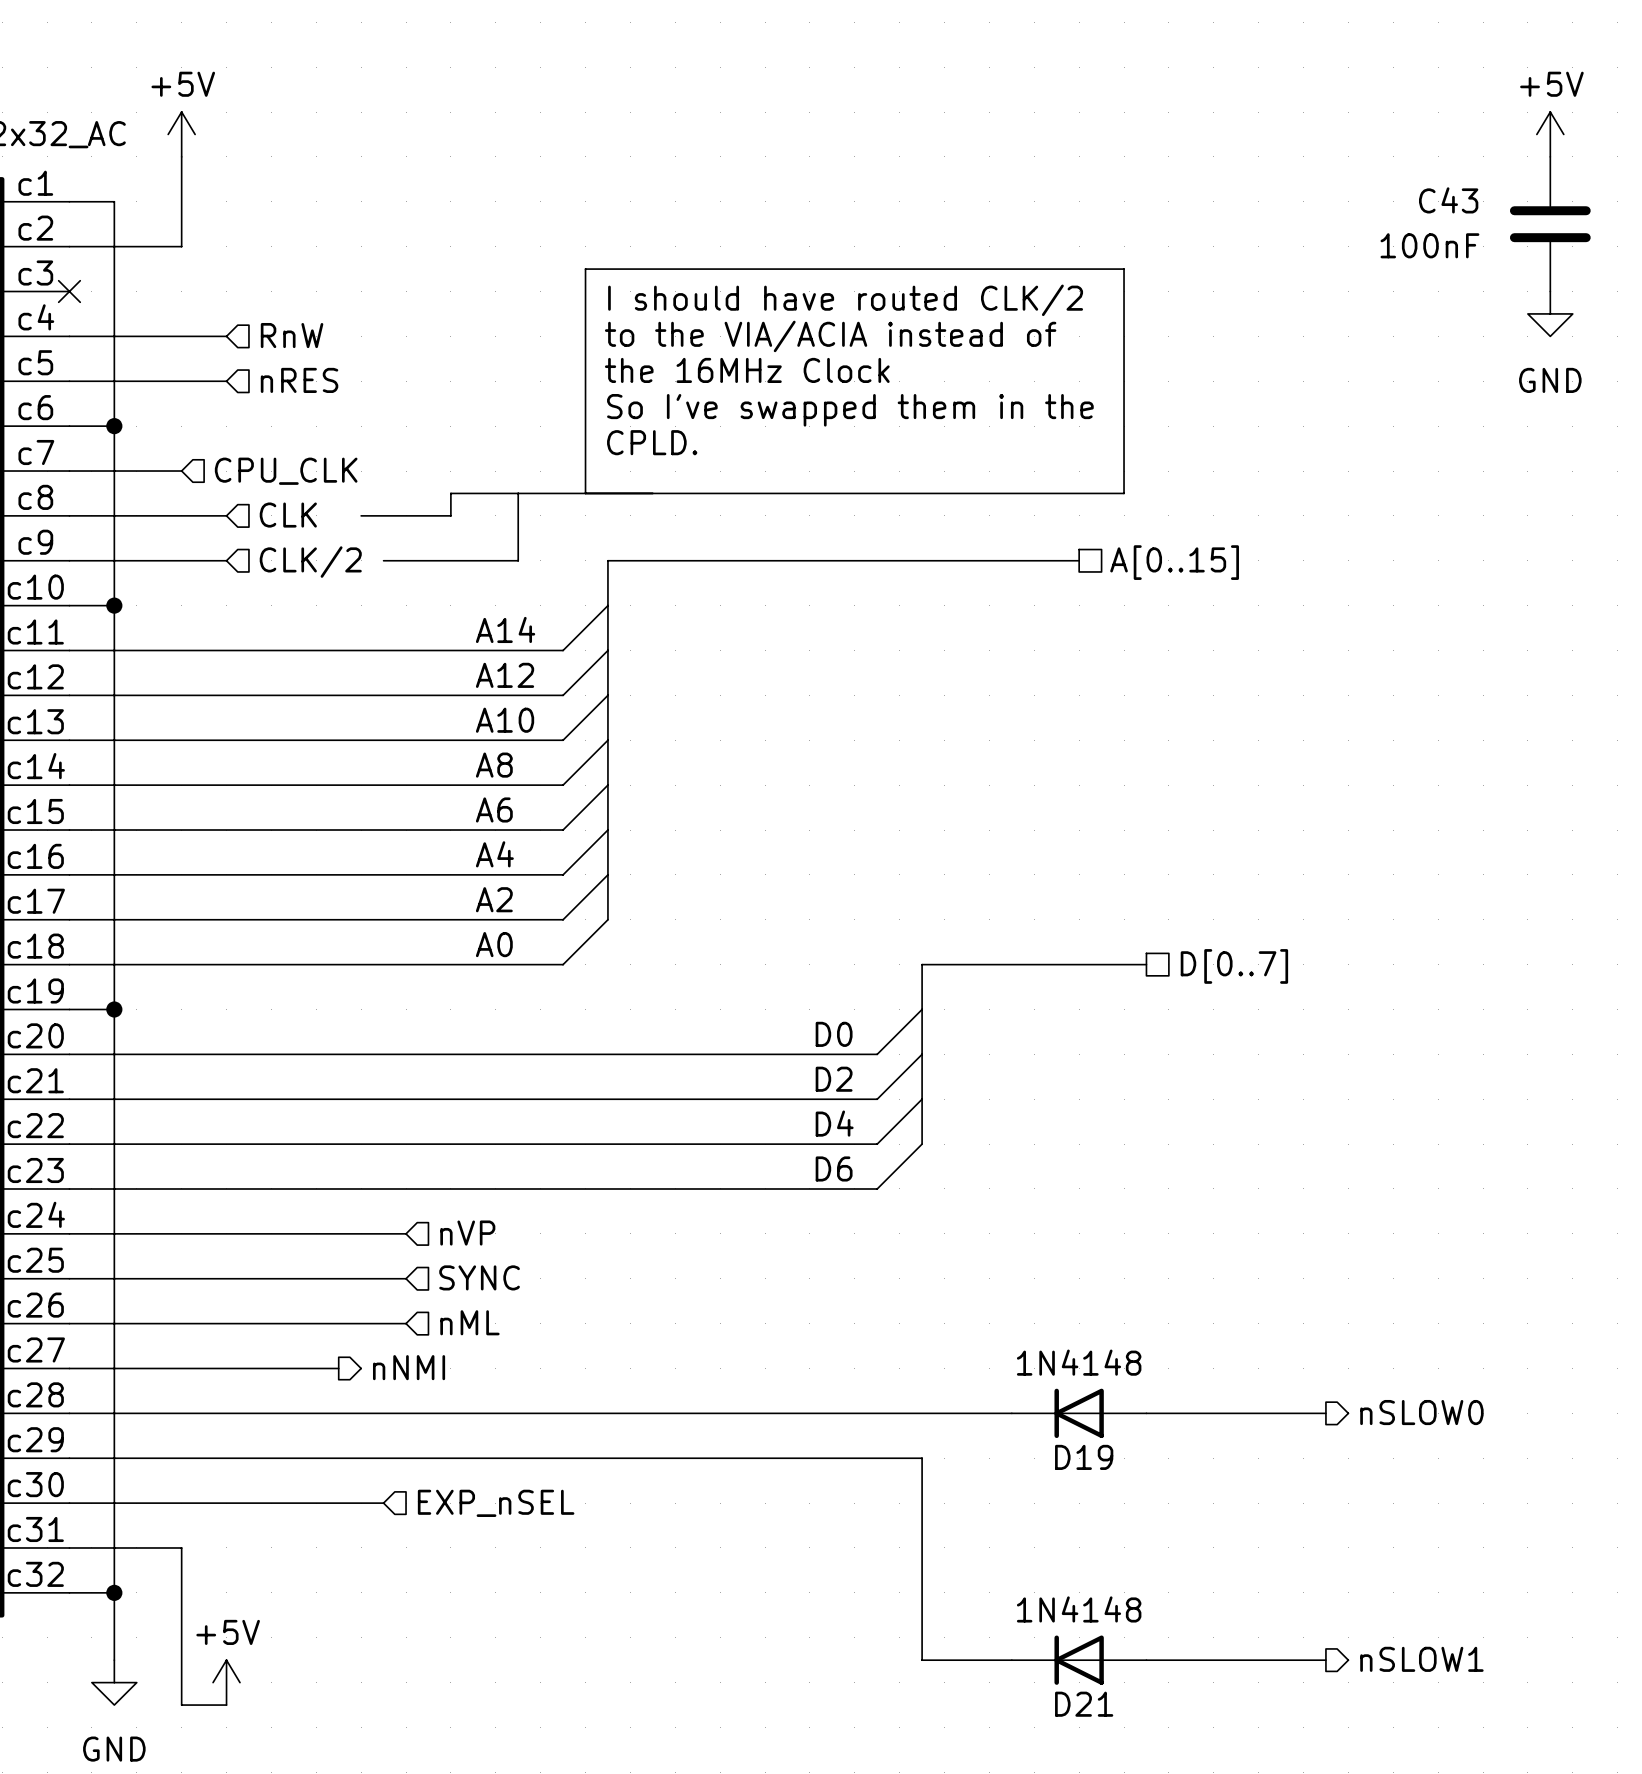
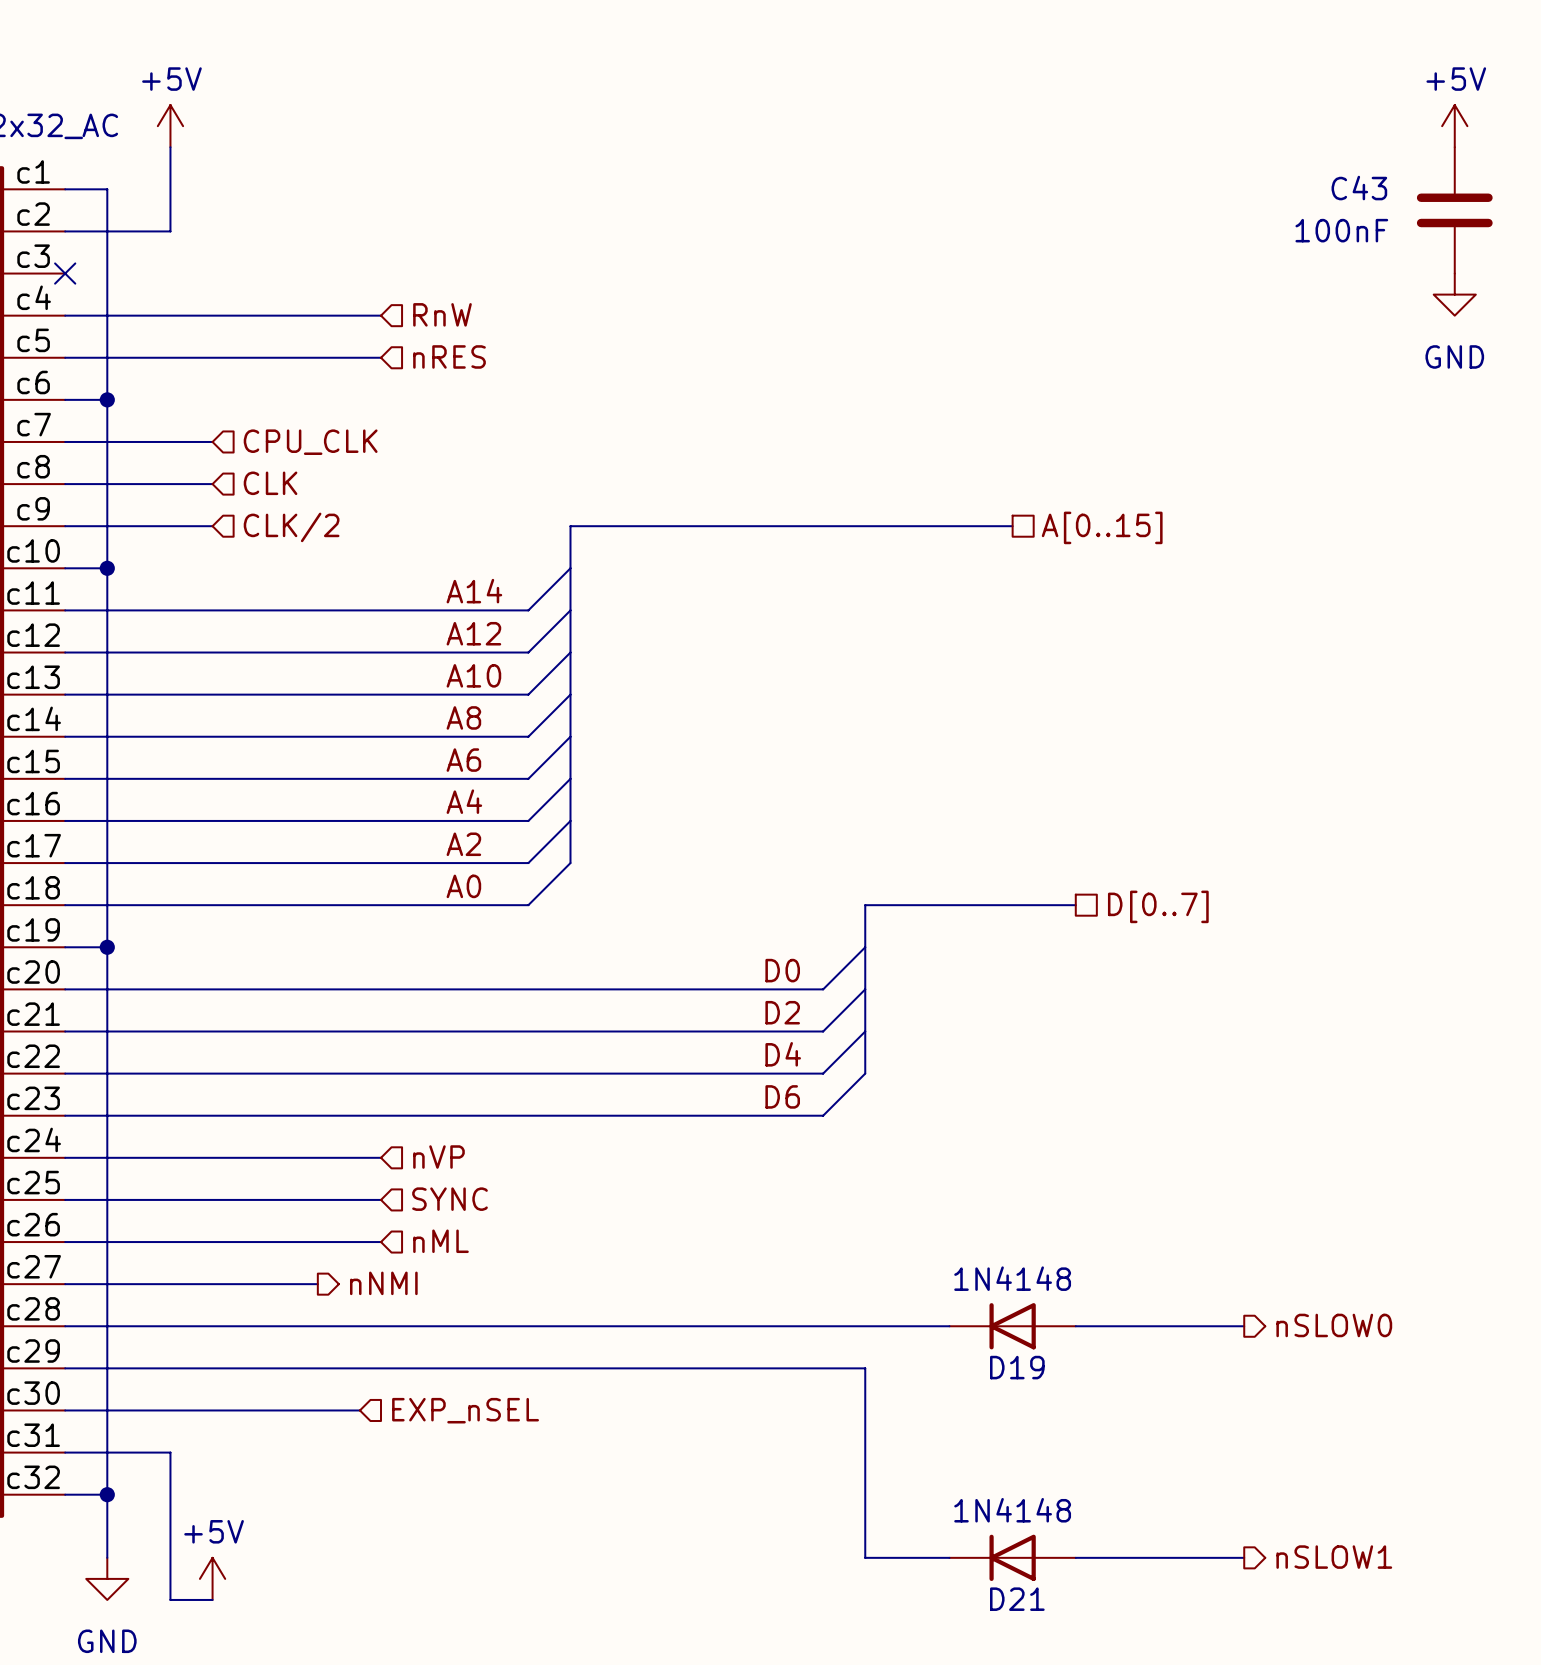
text: I should have routed CLK/2 (845, 300) -> none
hierarchical label position: RnW (292, 335) -> RnW (442, 314)
wire: none -> (212, 315) (381, 315)
text: to the VIA/ACIA instead of (830, 336) -> none
text: the 16MHz Clock (747, 370) -> none
hierarchical label position: nRES (299, 380) -> nRES (449, 356)
wire: none -> (212, 357) (381, 357)
text: So I've swapped them in the (850, 410) -> none
text: CPLD. (652, 442) -> none
wire: none -> (170, 441) (212, 441)
hierarchical label position: CPU_CLK (286, 471) -> CPU_CLK (310, 442)
line: (518, 493) (518, 560) (383, 560) -> none
line: (585, 493) (585, 269) (1124, 269) (1124, 493) (450, 493) (450, 515) (361, 515) -> none

